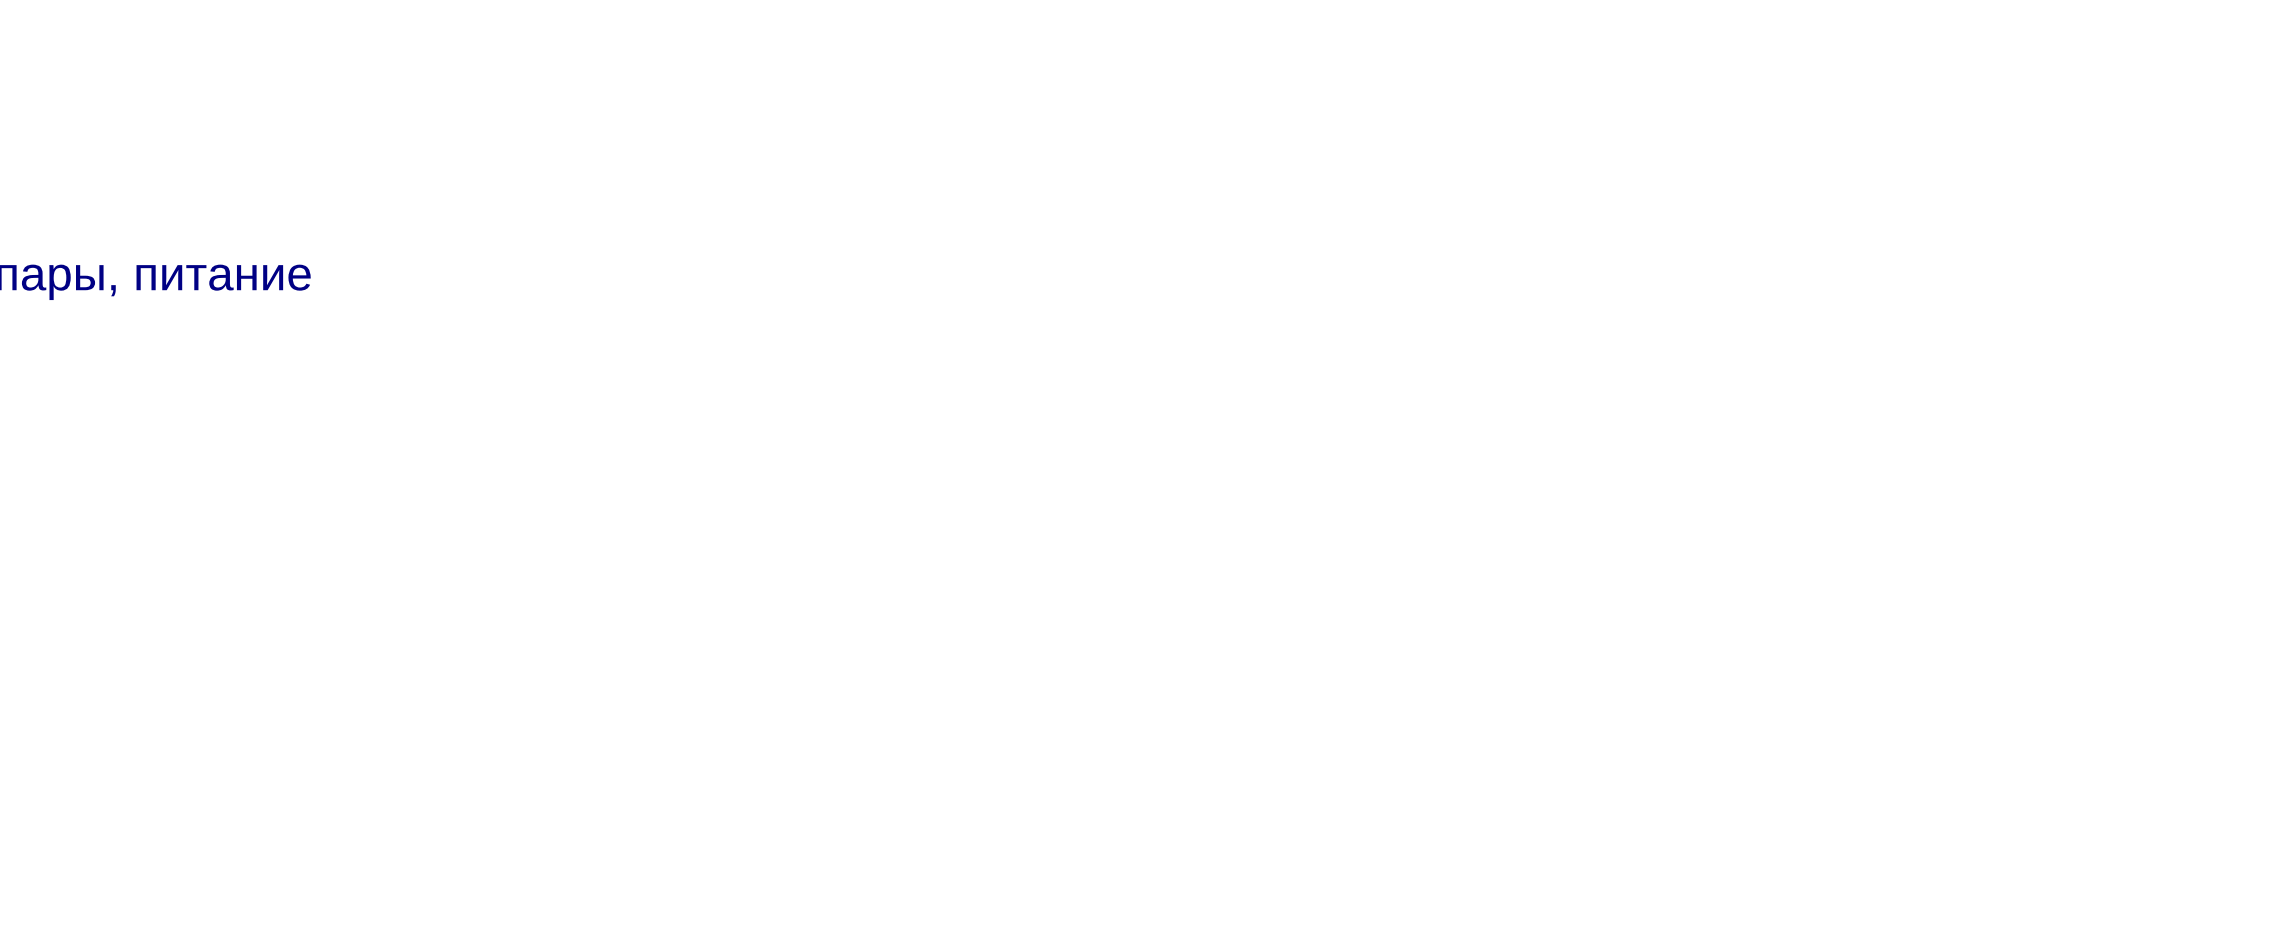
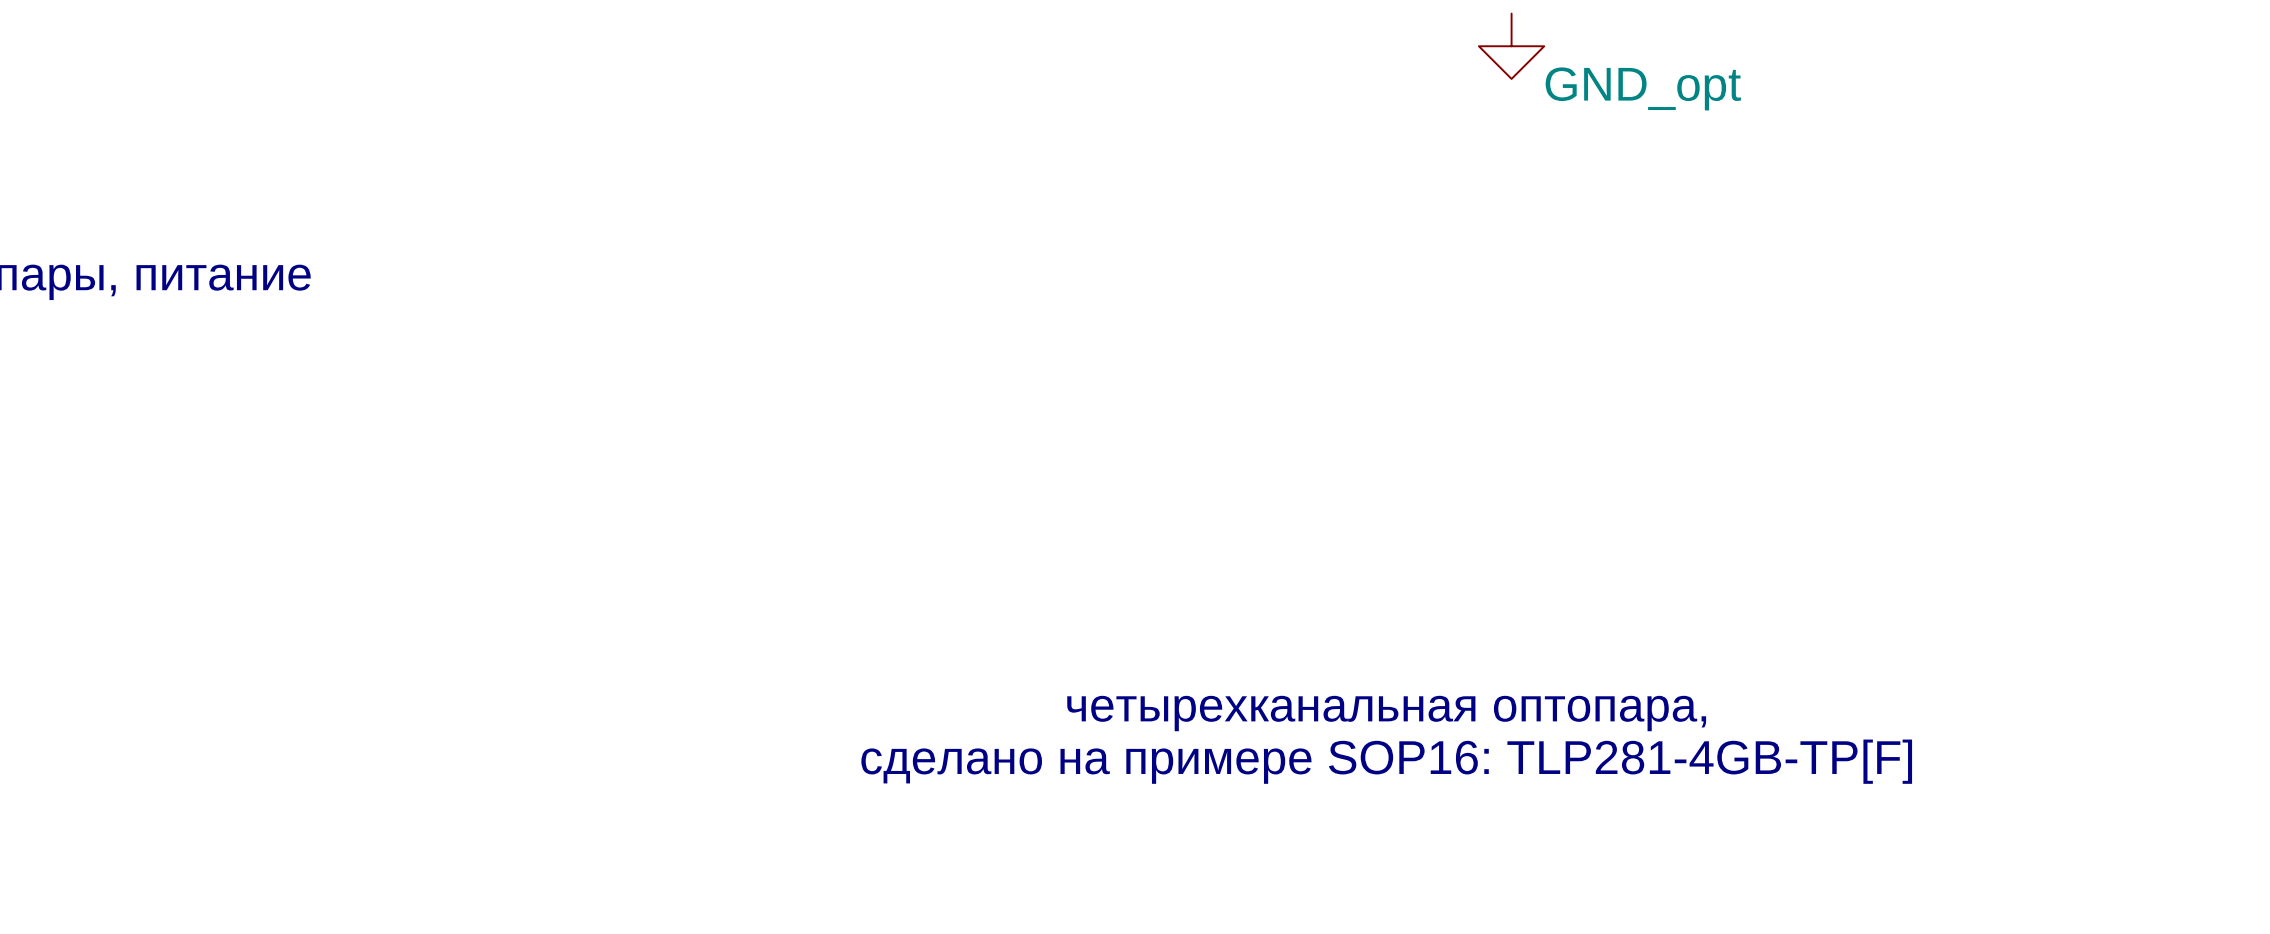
power symbol: none -> GND_opt (1511, 46)
text: none -> четырехканальная оптопара, (1386, 713)
text: none -> сделано на примере SOP16: TLP281-4GB-TP[F] (1386, 761)

